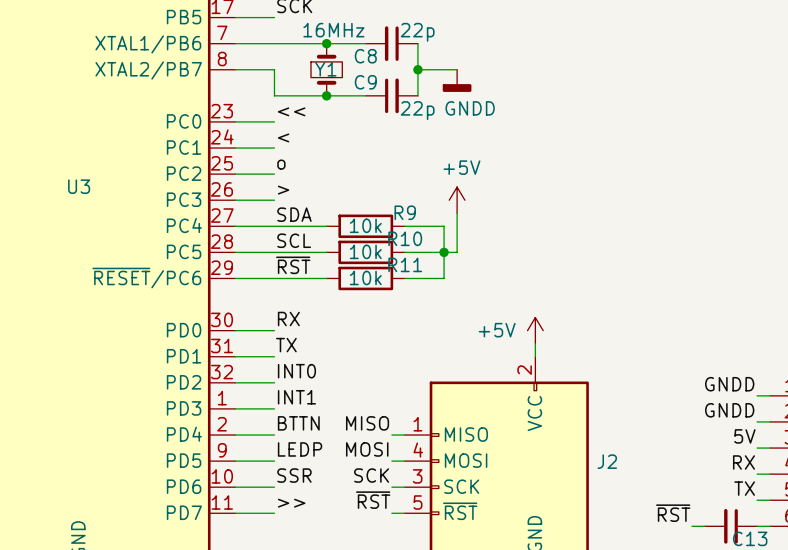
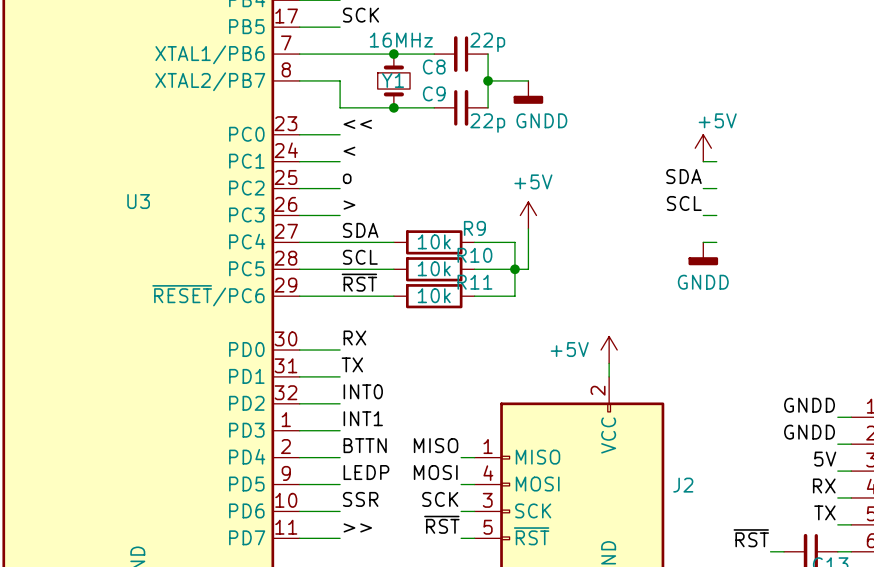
power symbol: none -> +5V (703, 148)
wire: none -> (703, 161) (716, 161)
label: none -> SDA (683, 176)
wire: none -> (703, 188) (716, 188)
label: none -> SCL (684, 203)
wire: none -> (703, 215) (716, 215)
wire: none -> (703, 242) (716, 242)
power symbol: none -> GNDD (703, 253)

